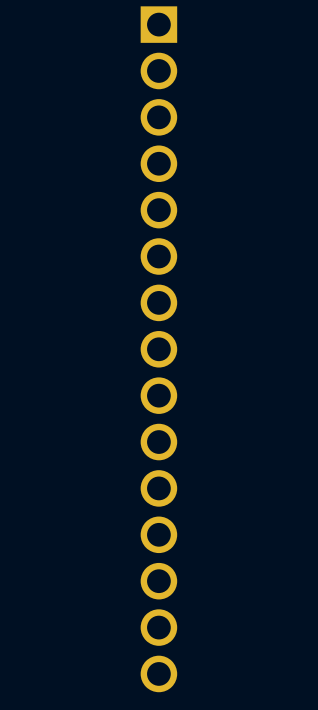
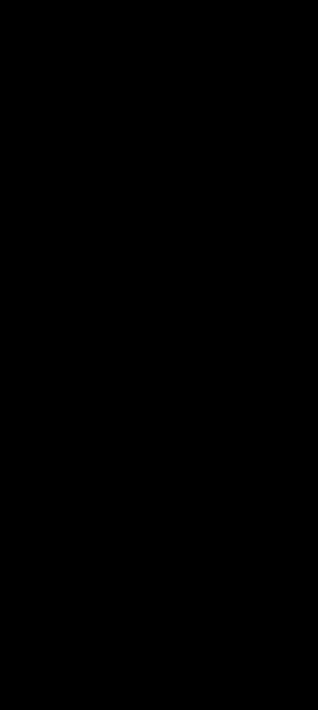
part: (158, 349) -> none

